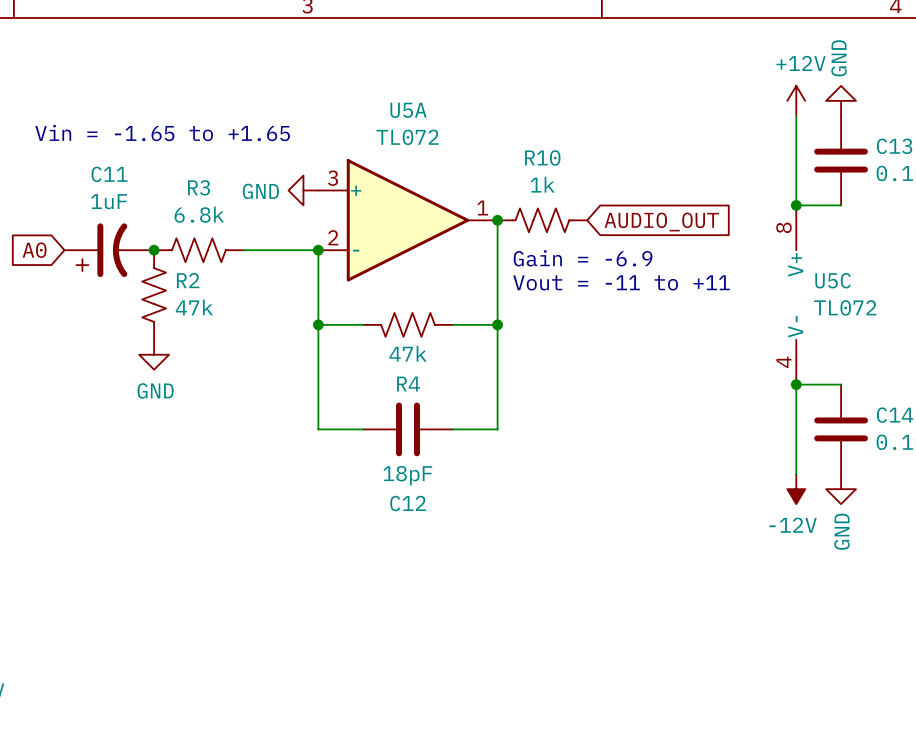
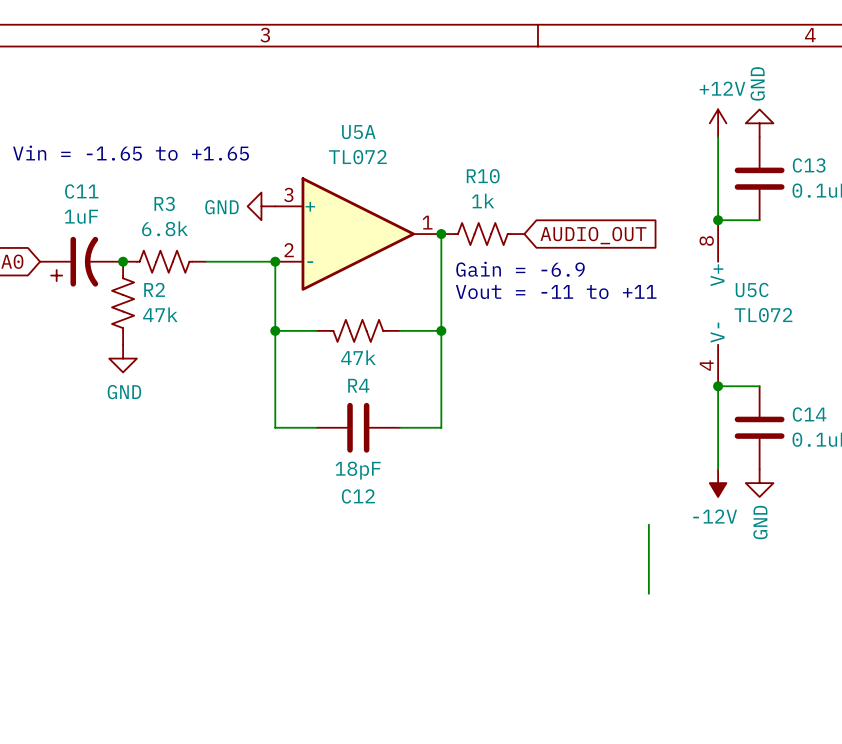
wire: none -> (648, 524) (648, 593)

